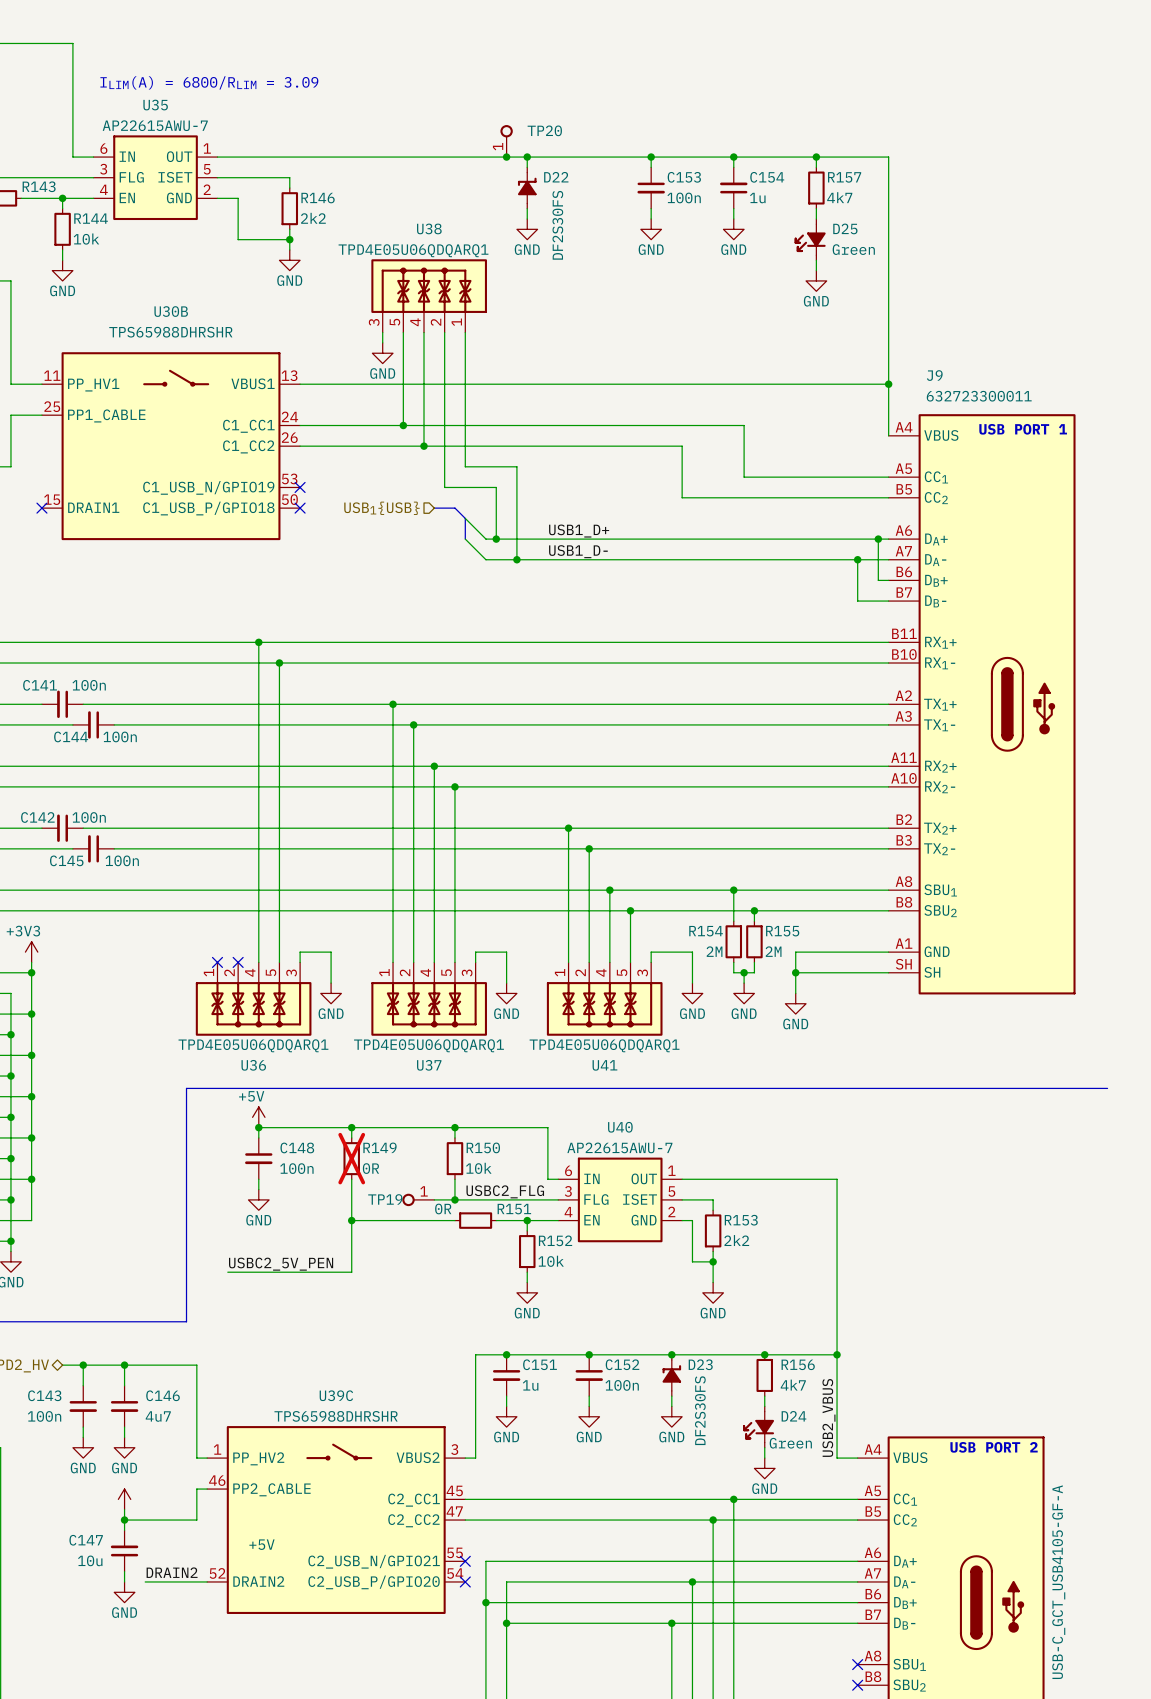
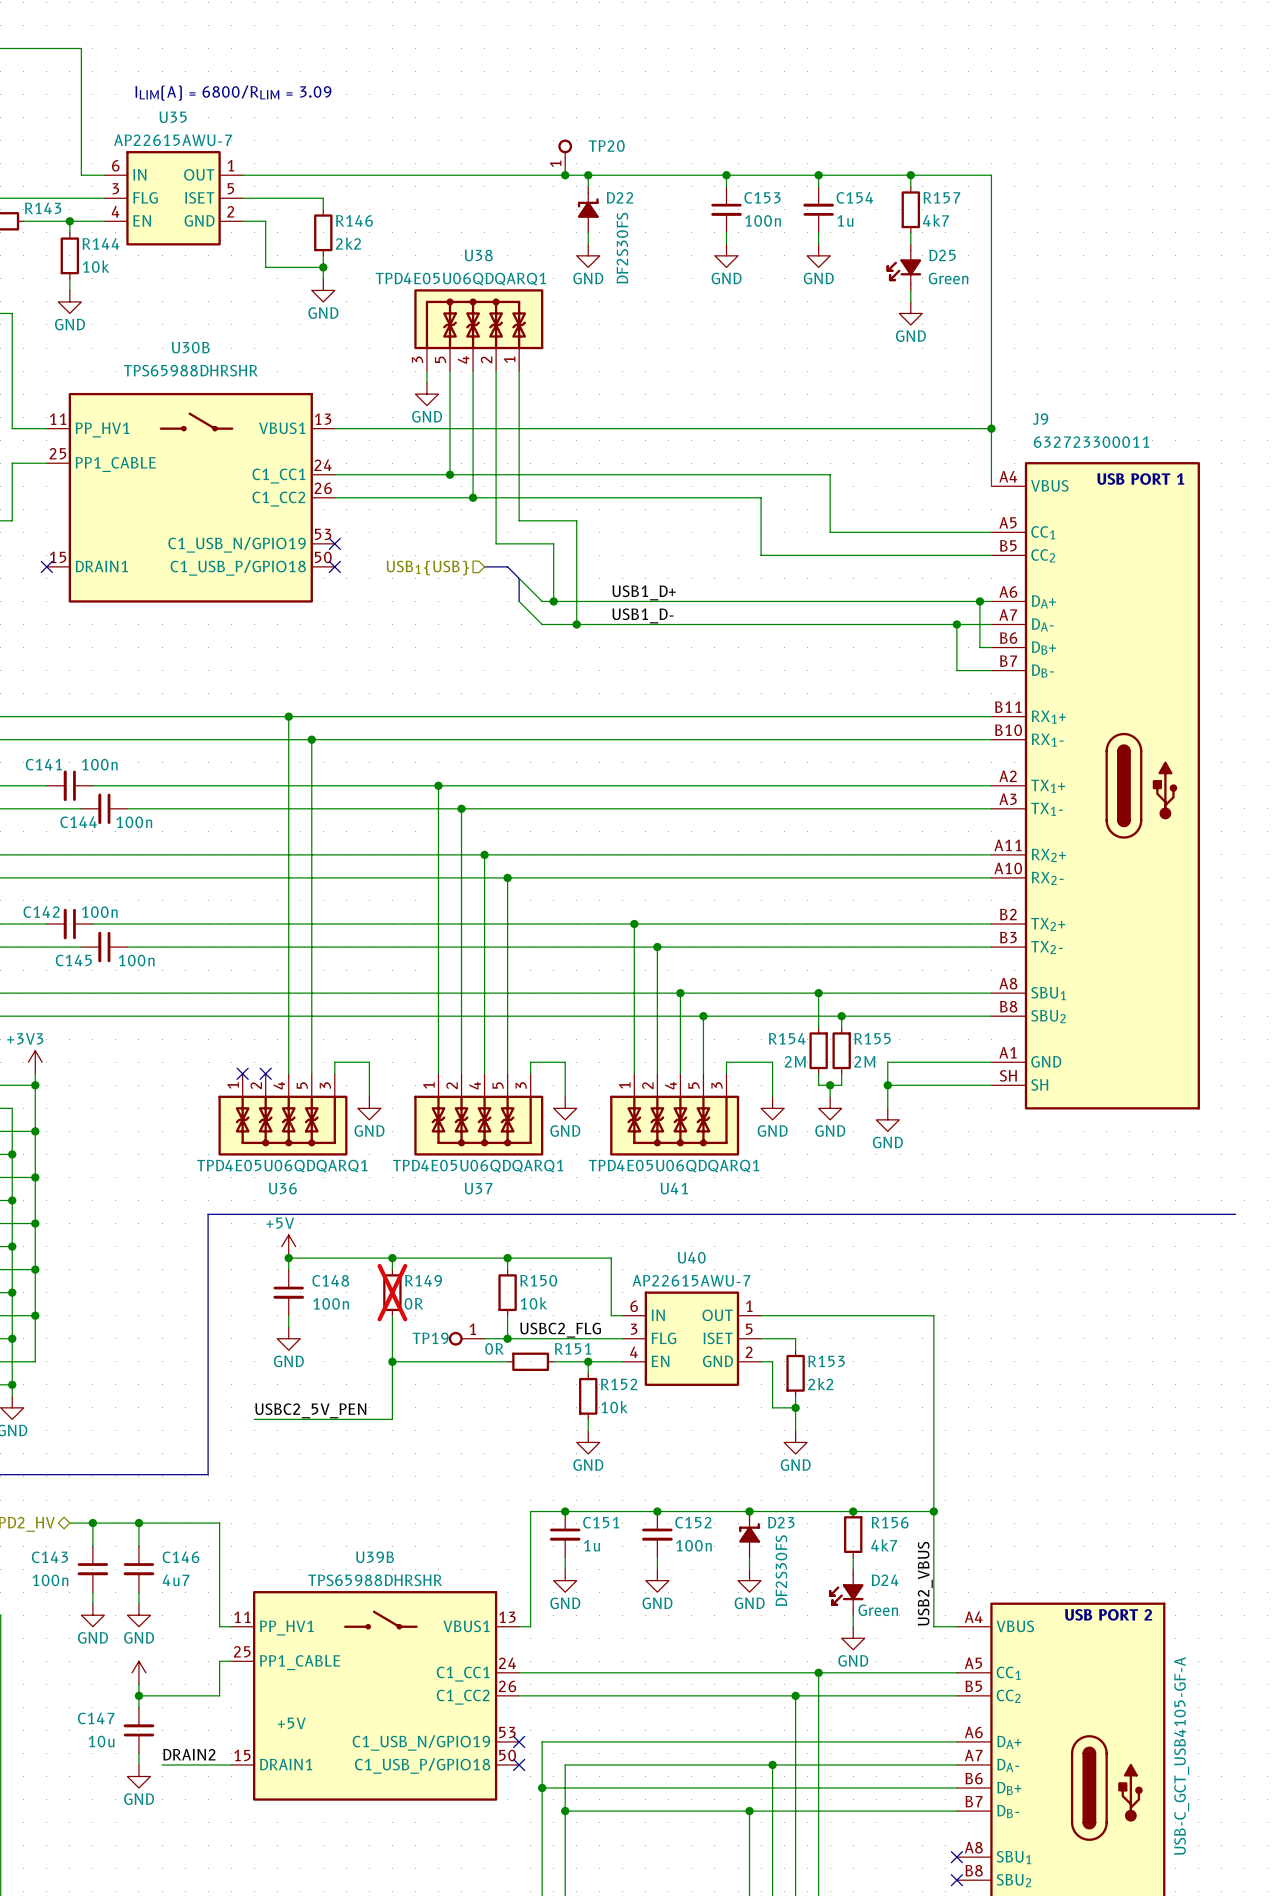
U39C: (336, 1520) -> none
U39B: none -> (375, 1695)

